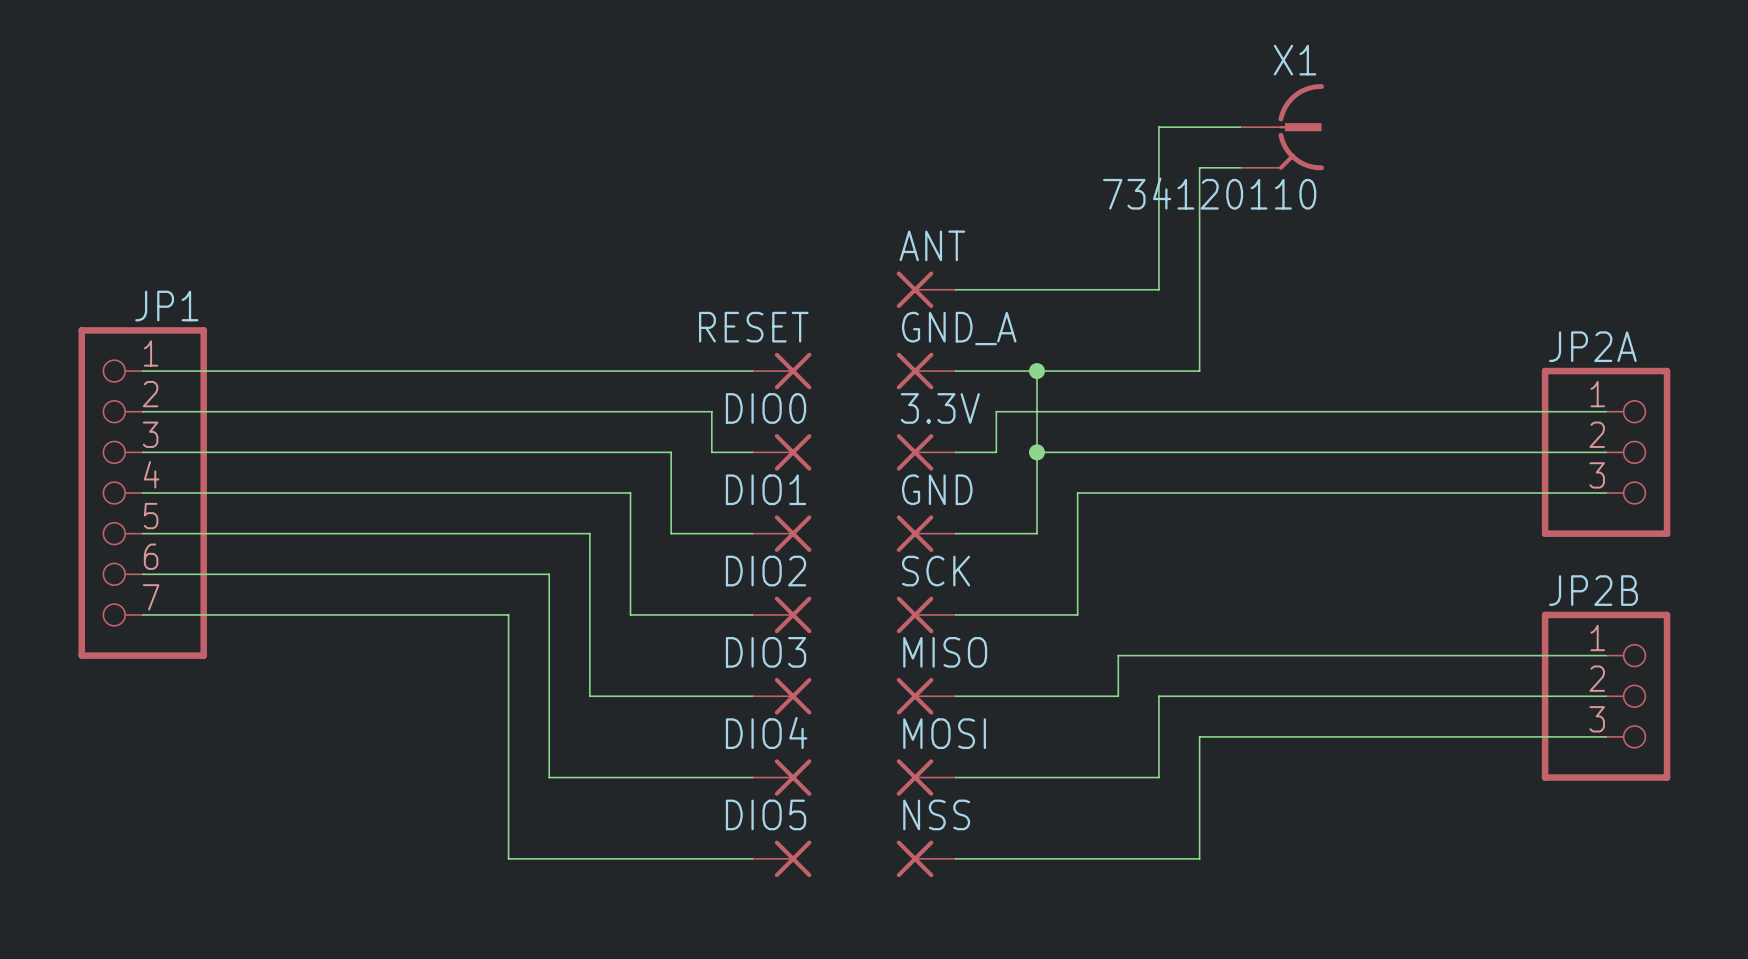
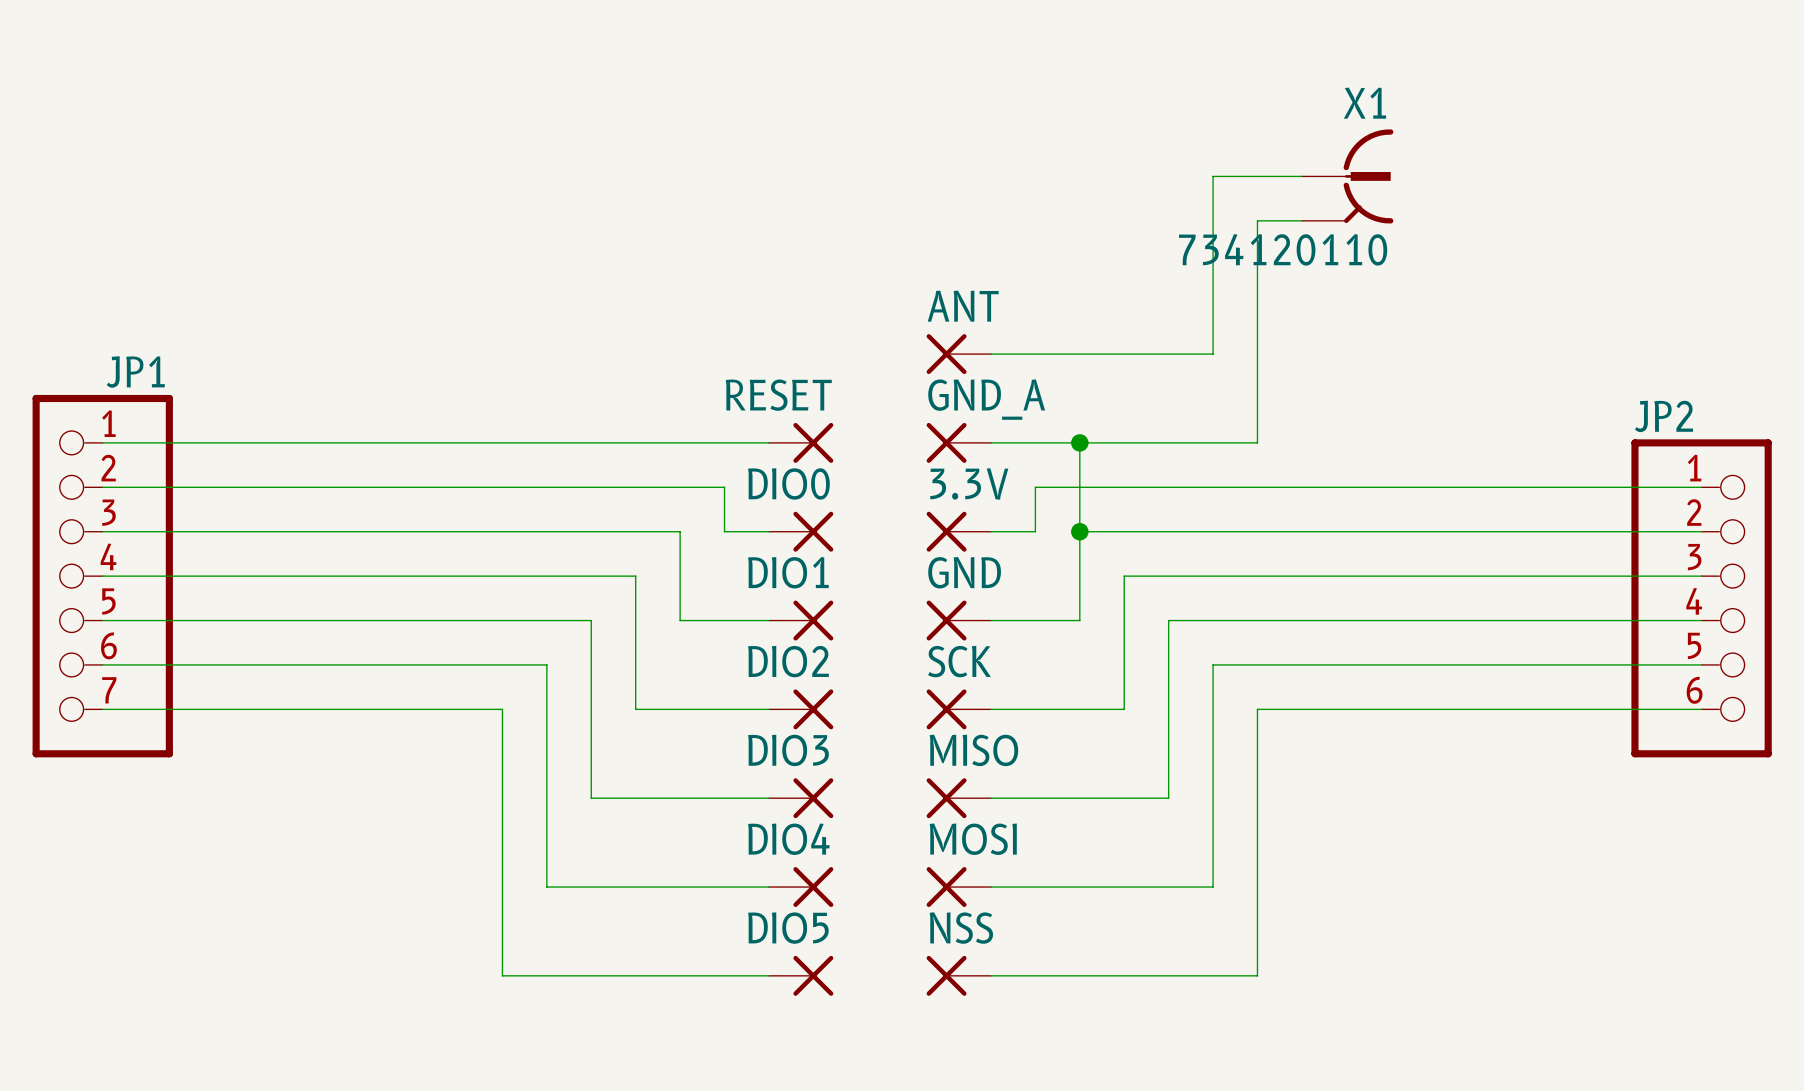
JP2A: (1606, 452) -> none
JP2: none -> (1701, 598)
wire: (1118, 655) (1606, 655) -> (1168, 753) (1168, 620) (1701, 620)
wire: (1158, 696) (1606, 696) -> (1213, 798) (1213, 664) (1701, 664)
JP2B: (1606, 696) -> none
wire: (1199, 736) (1606, 736) -> (1257, 842) (1257, 709) (1701, 709)

